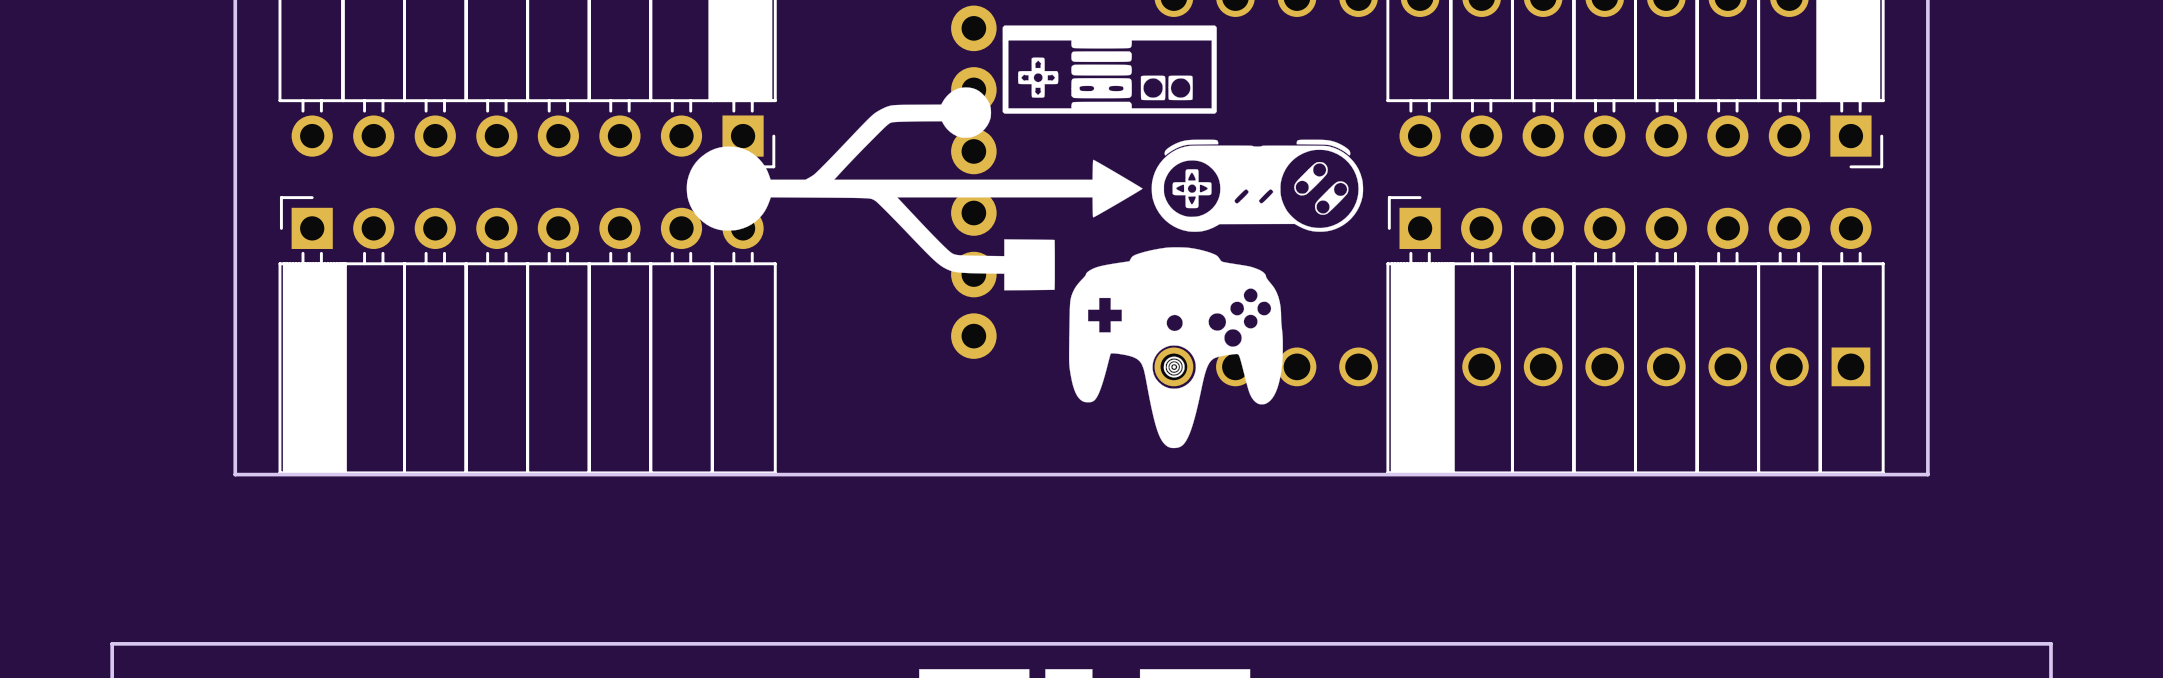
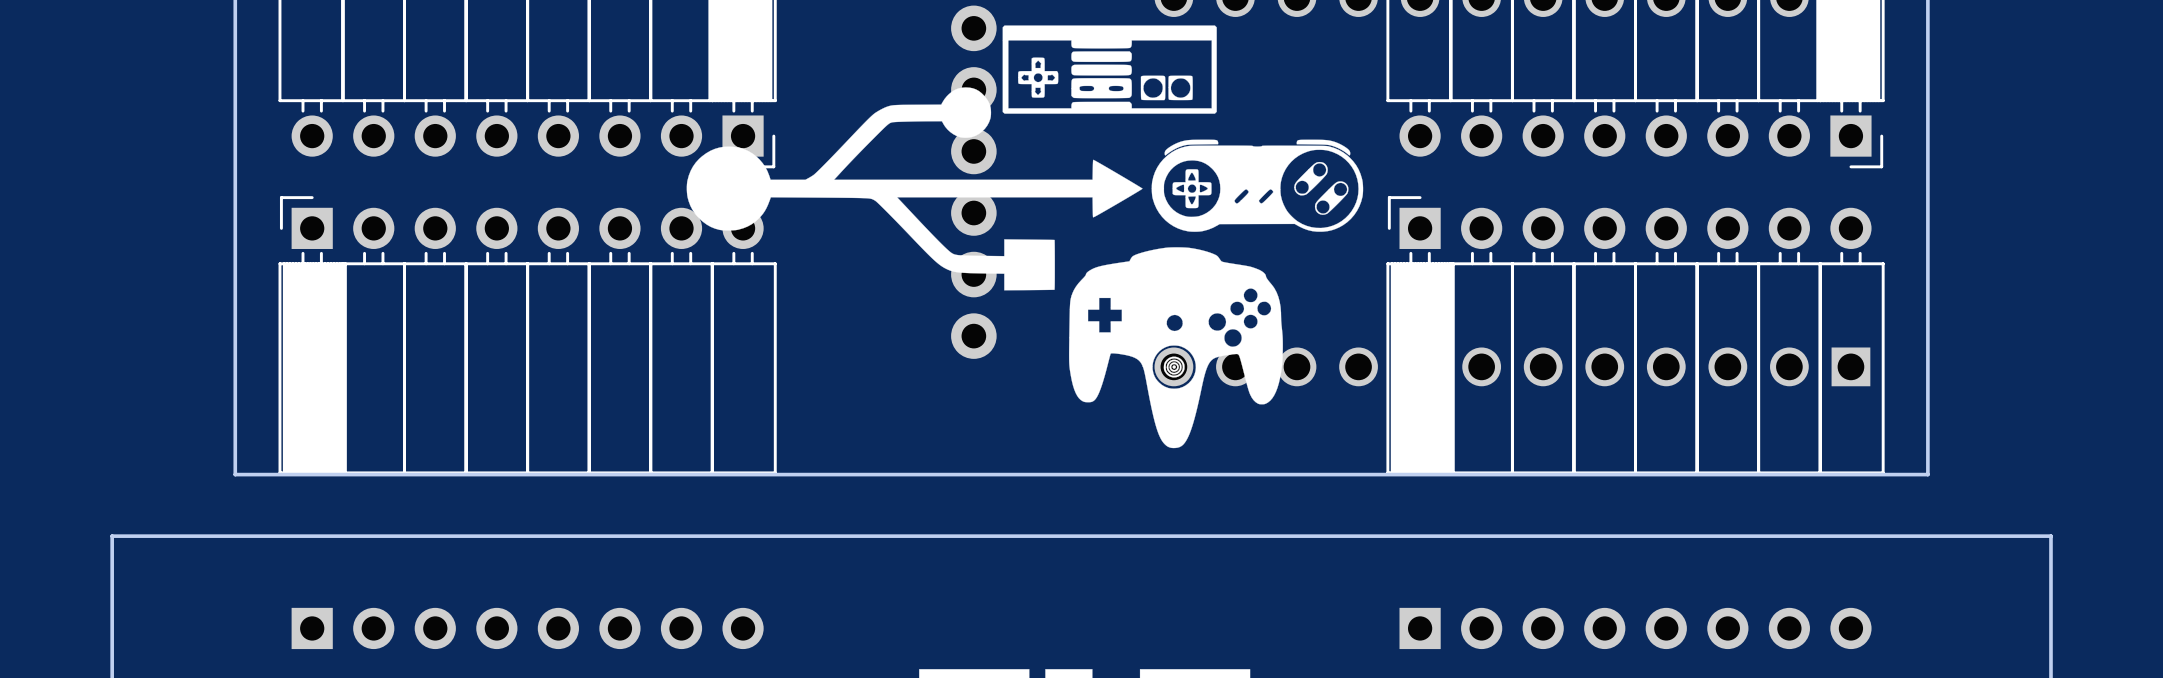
part: none -> (527, 628)
part: none -> (1635, 628)
board edge: (2050, 643) (112, 643) -> (2050, 643) (2050, 536) (112, 536) (112, 643)

